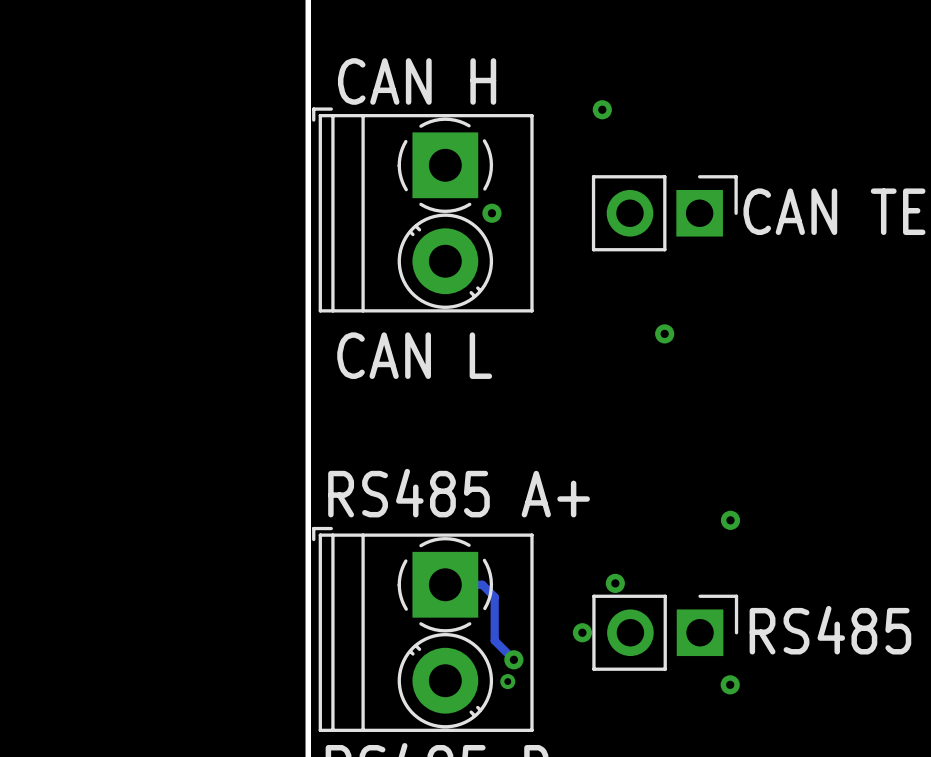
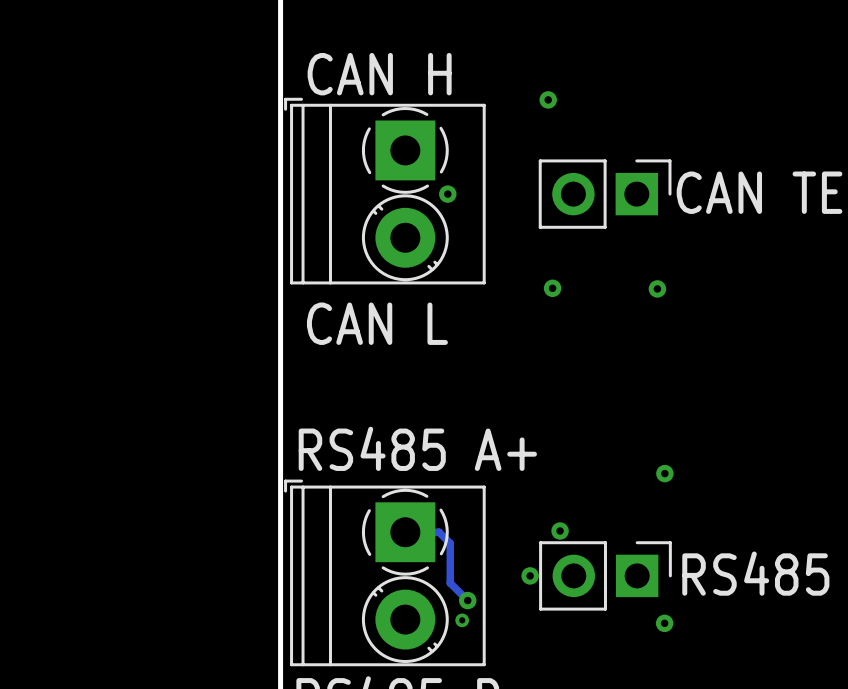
via: none -> (552, 288)
via: none -> (657, 288)
via: (664, 333) -> none

